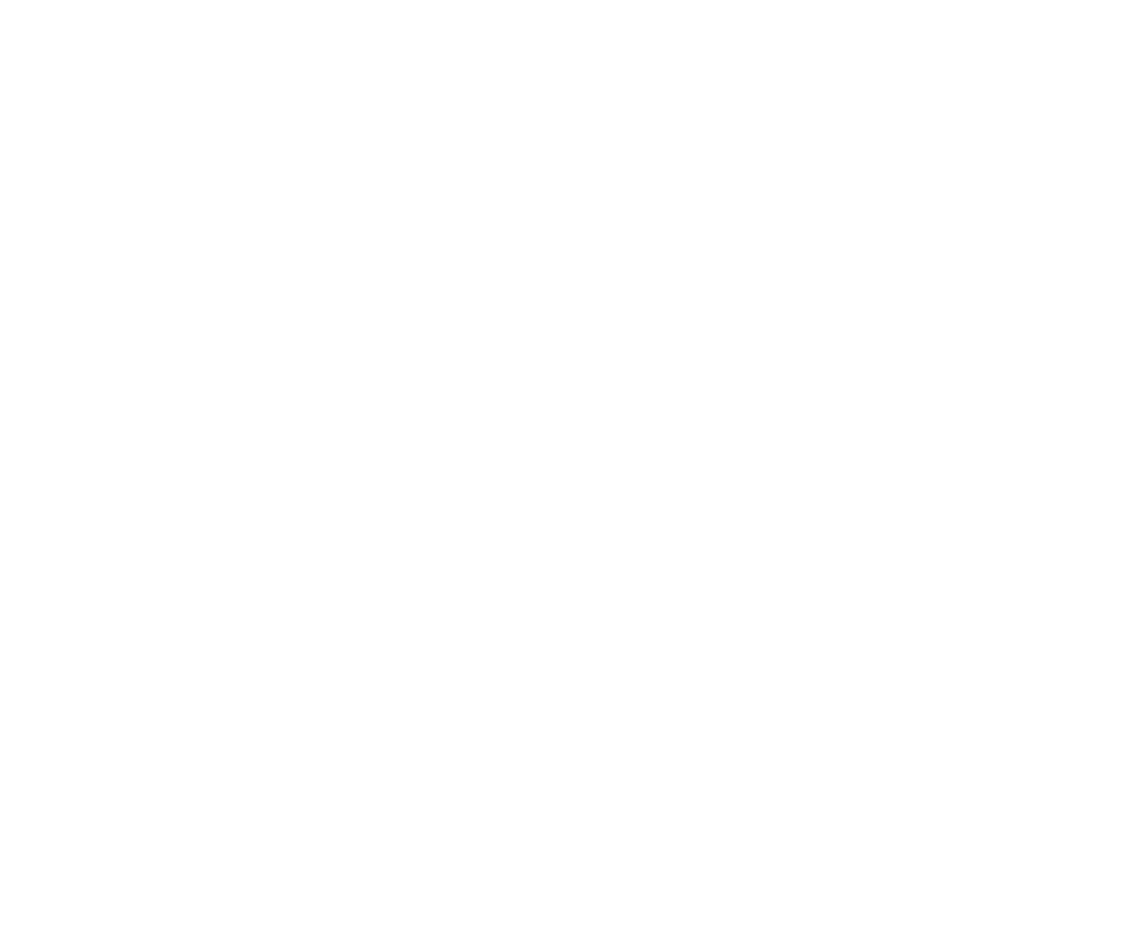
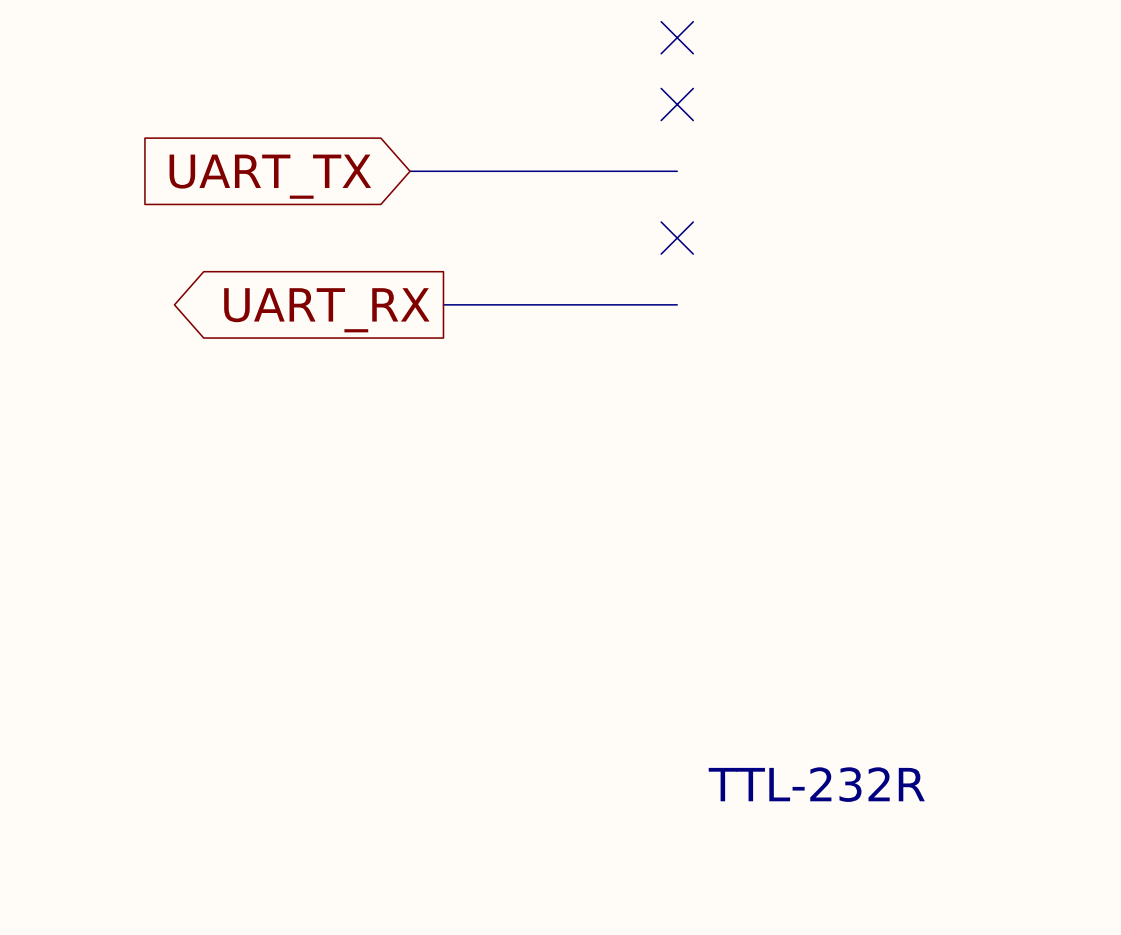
no-connect mark: none -> (677, 37)
no-connect mark: none -> (677, 104)
wire: none -> (410, 171) (677, 171)
global label: none -> UART_TX (270, 176)
no-connect mark: none -> (677, 238)
wire: none -> (443, 304) (677, 304)
global label: none -> UART_RX (326, 310)
text: none -> TTL-232R (816, 784)

